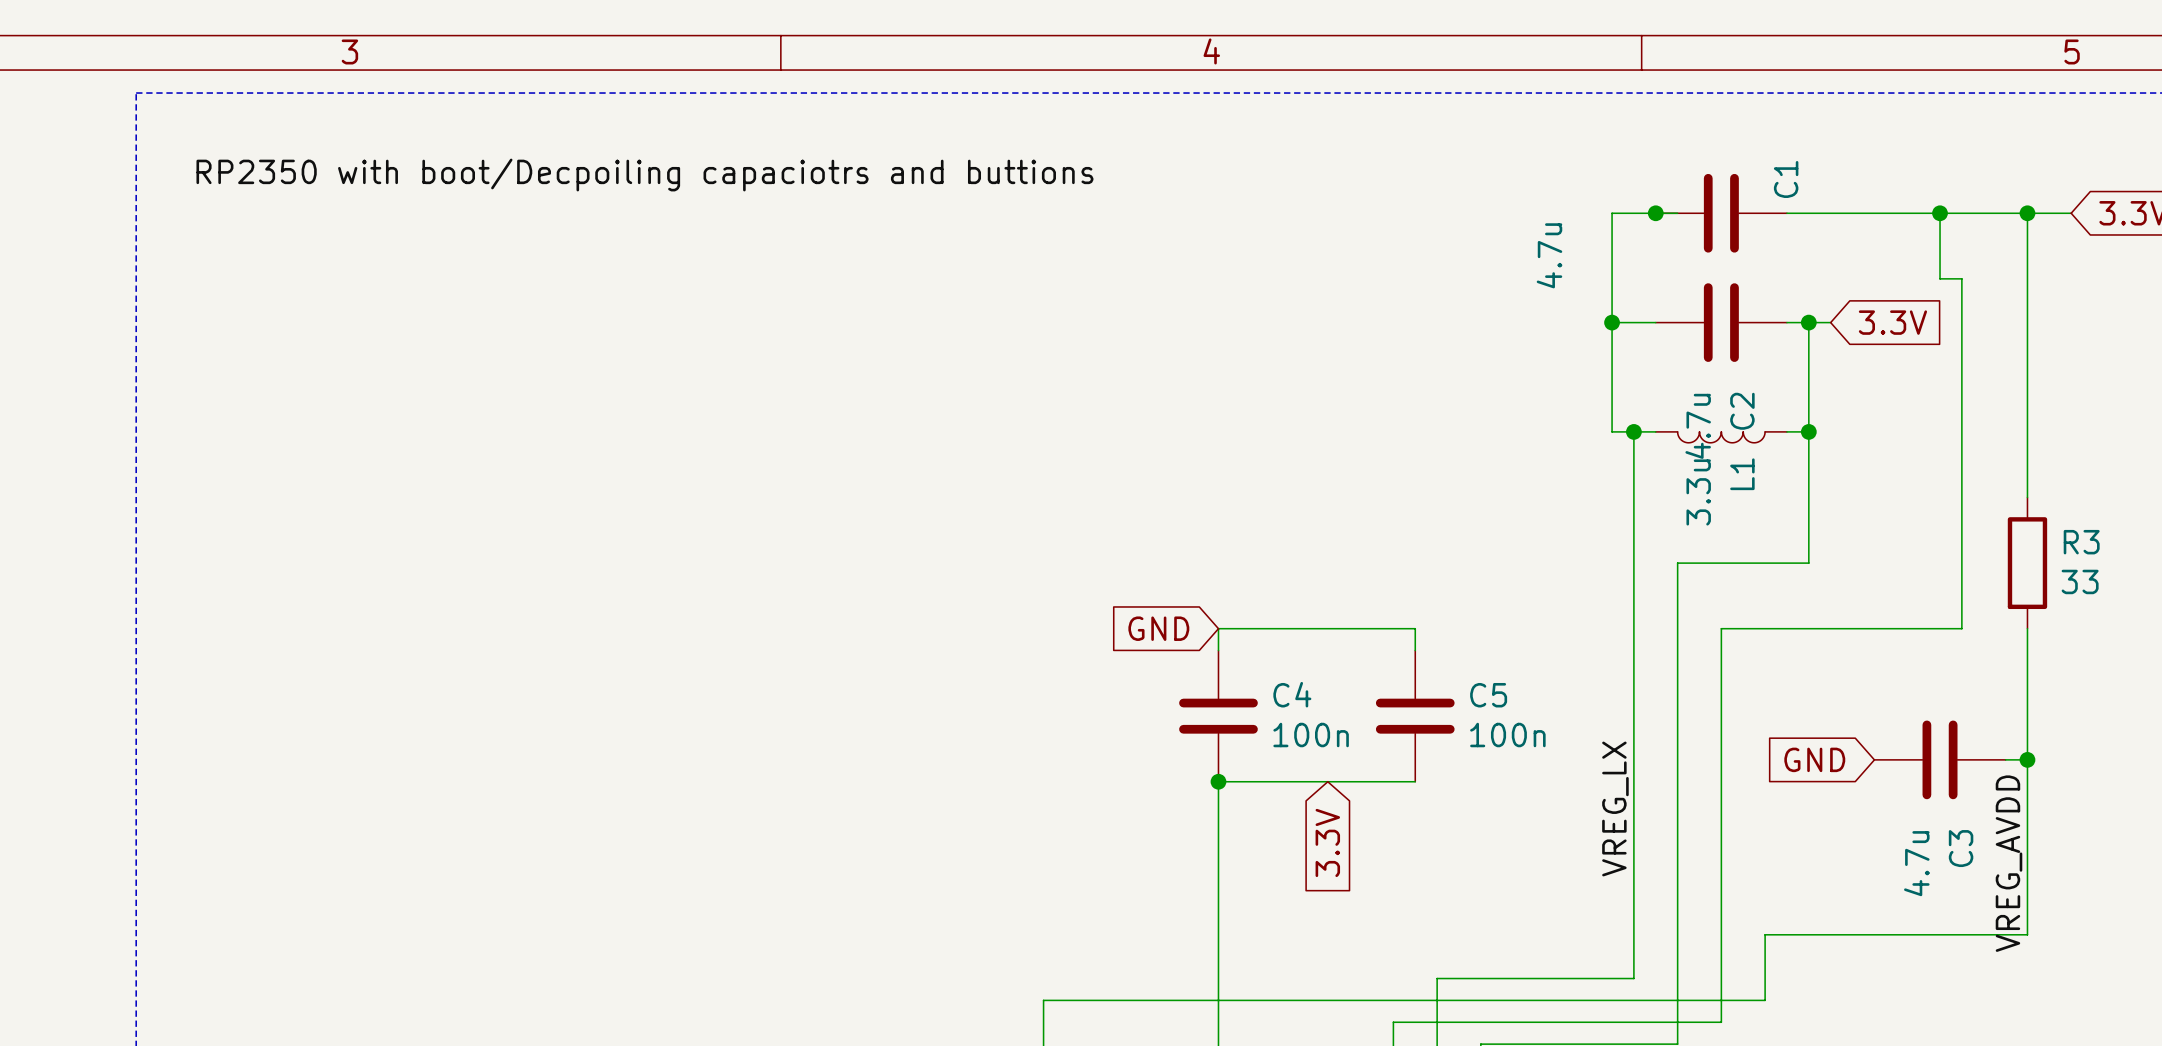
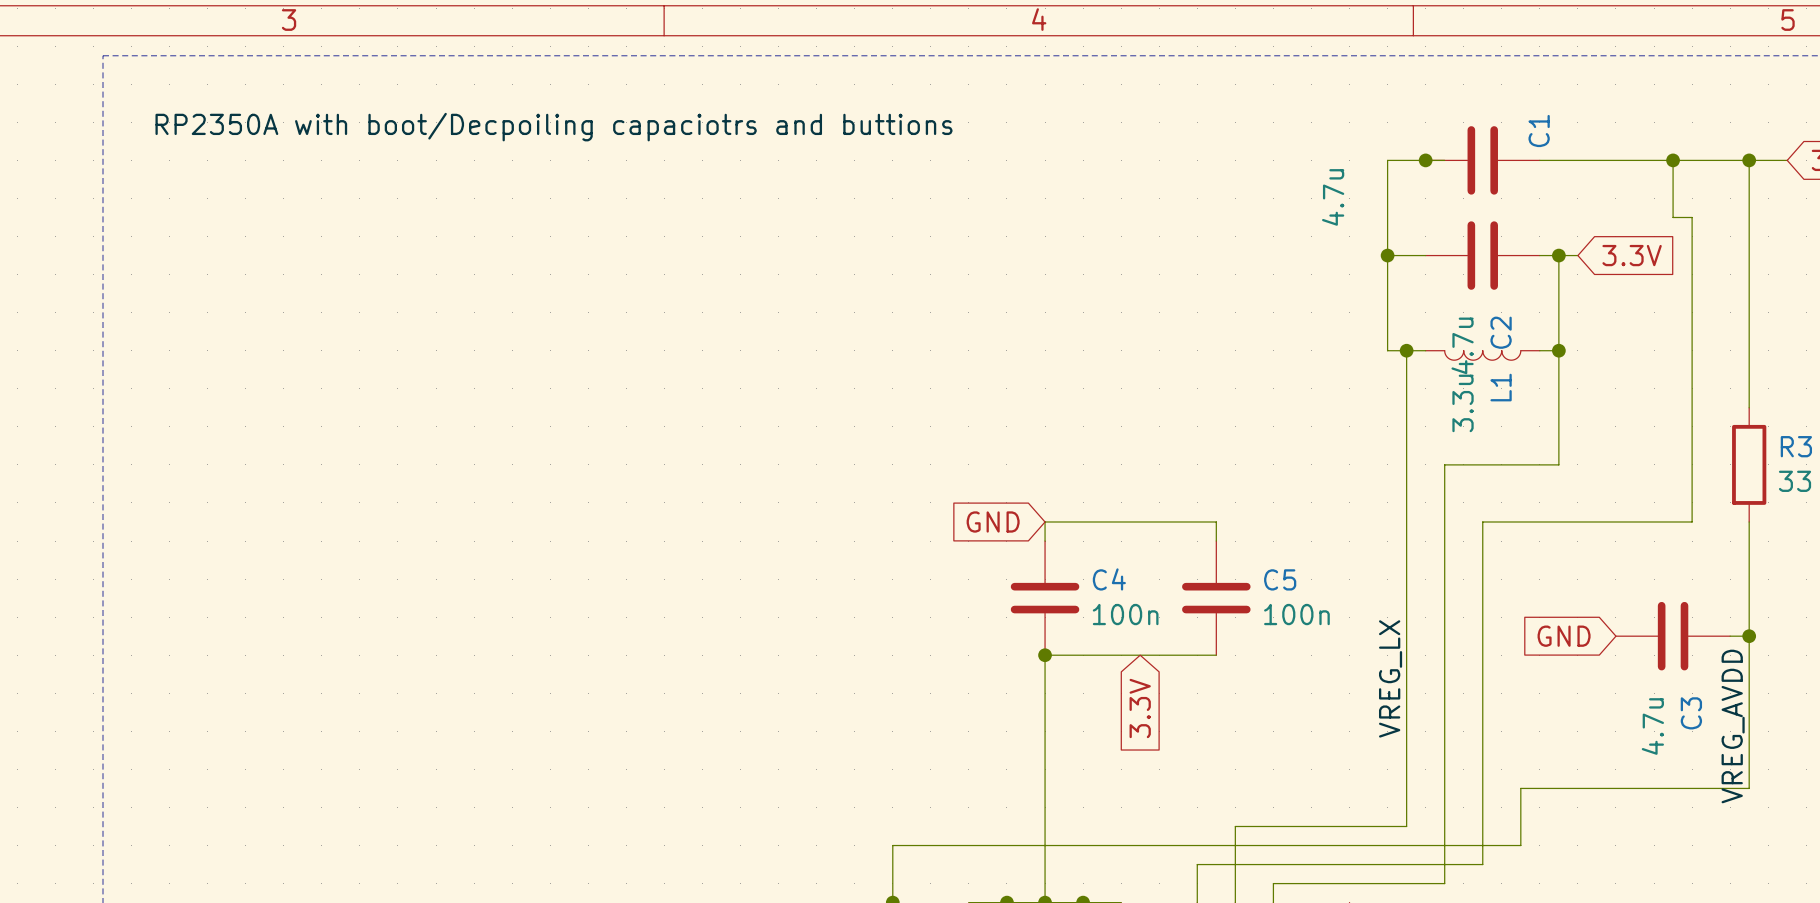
label: RP2350 with boot/Decpoiling capaciotrs and buttions (644, 175) -> RP2350A with boot/Decpoiling capaciotrs and buttions (554, 127)

